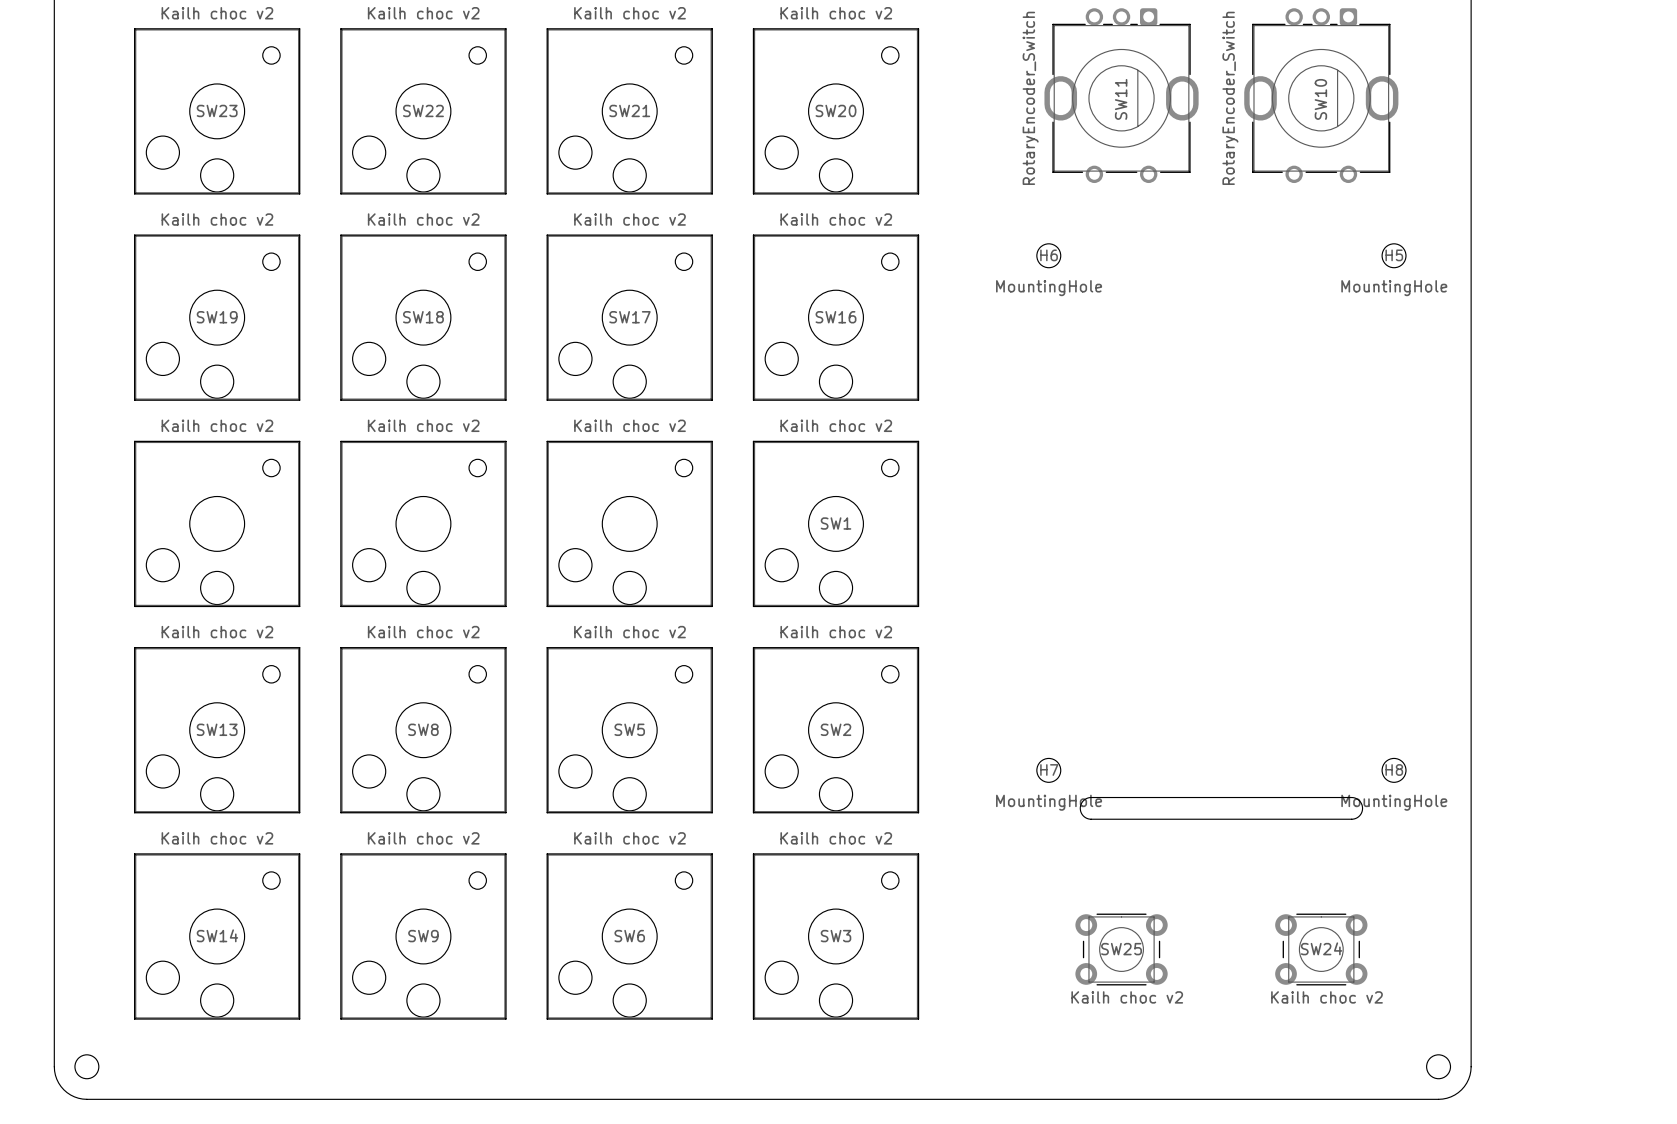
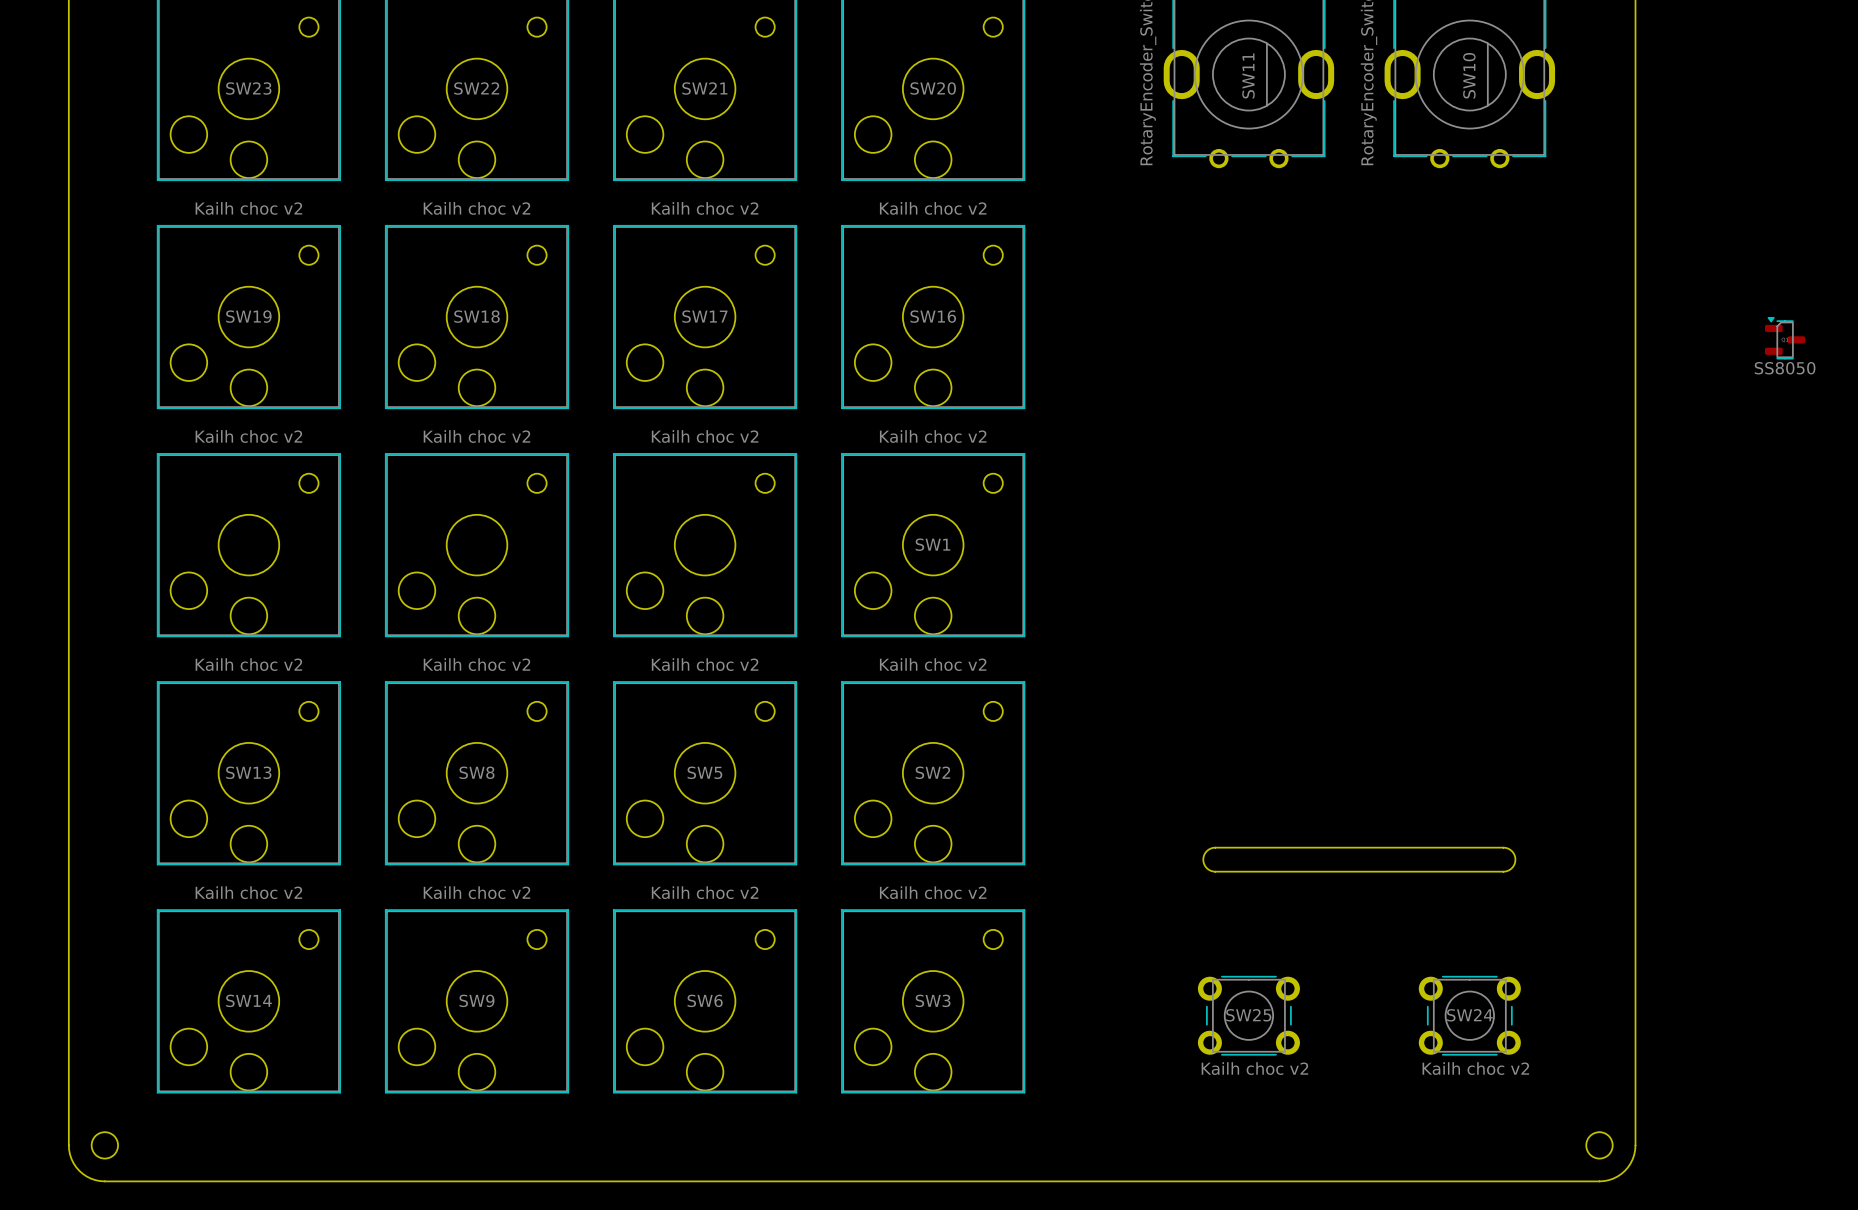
H6: MountingHole (1048, 255) -> none
H5: MountingHole (1394, 255) -> none
part: none -> SS8050 (1785, 338)
H7: MountingHole (1048, 770) -> none
H8: MountingHole (1394, 770) -> none

